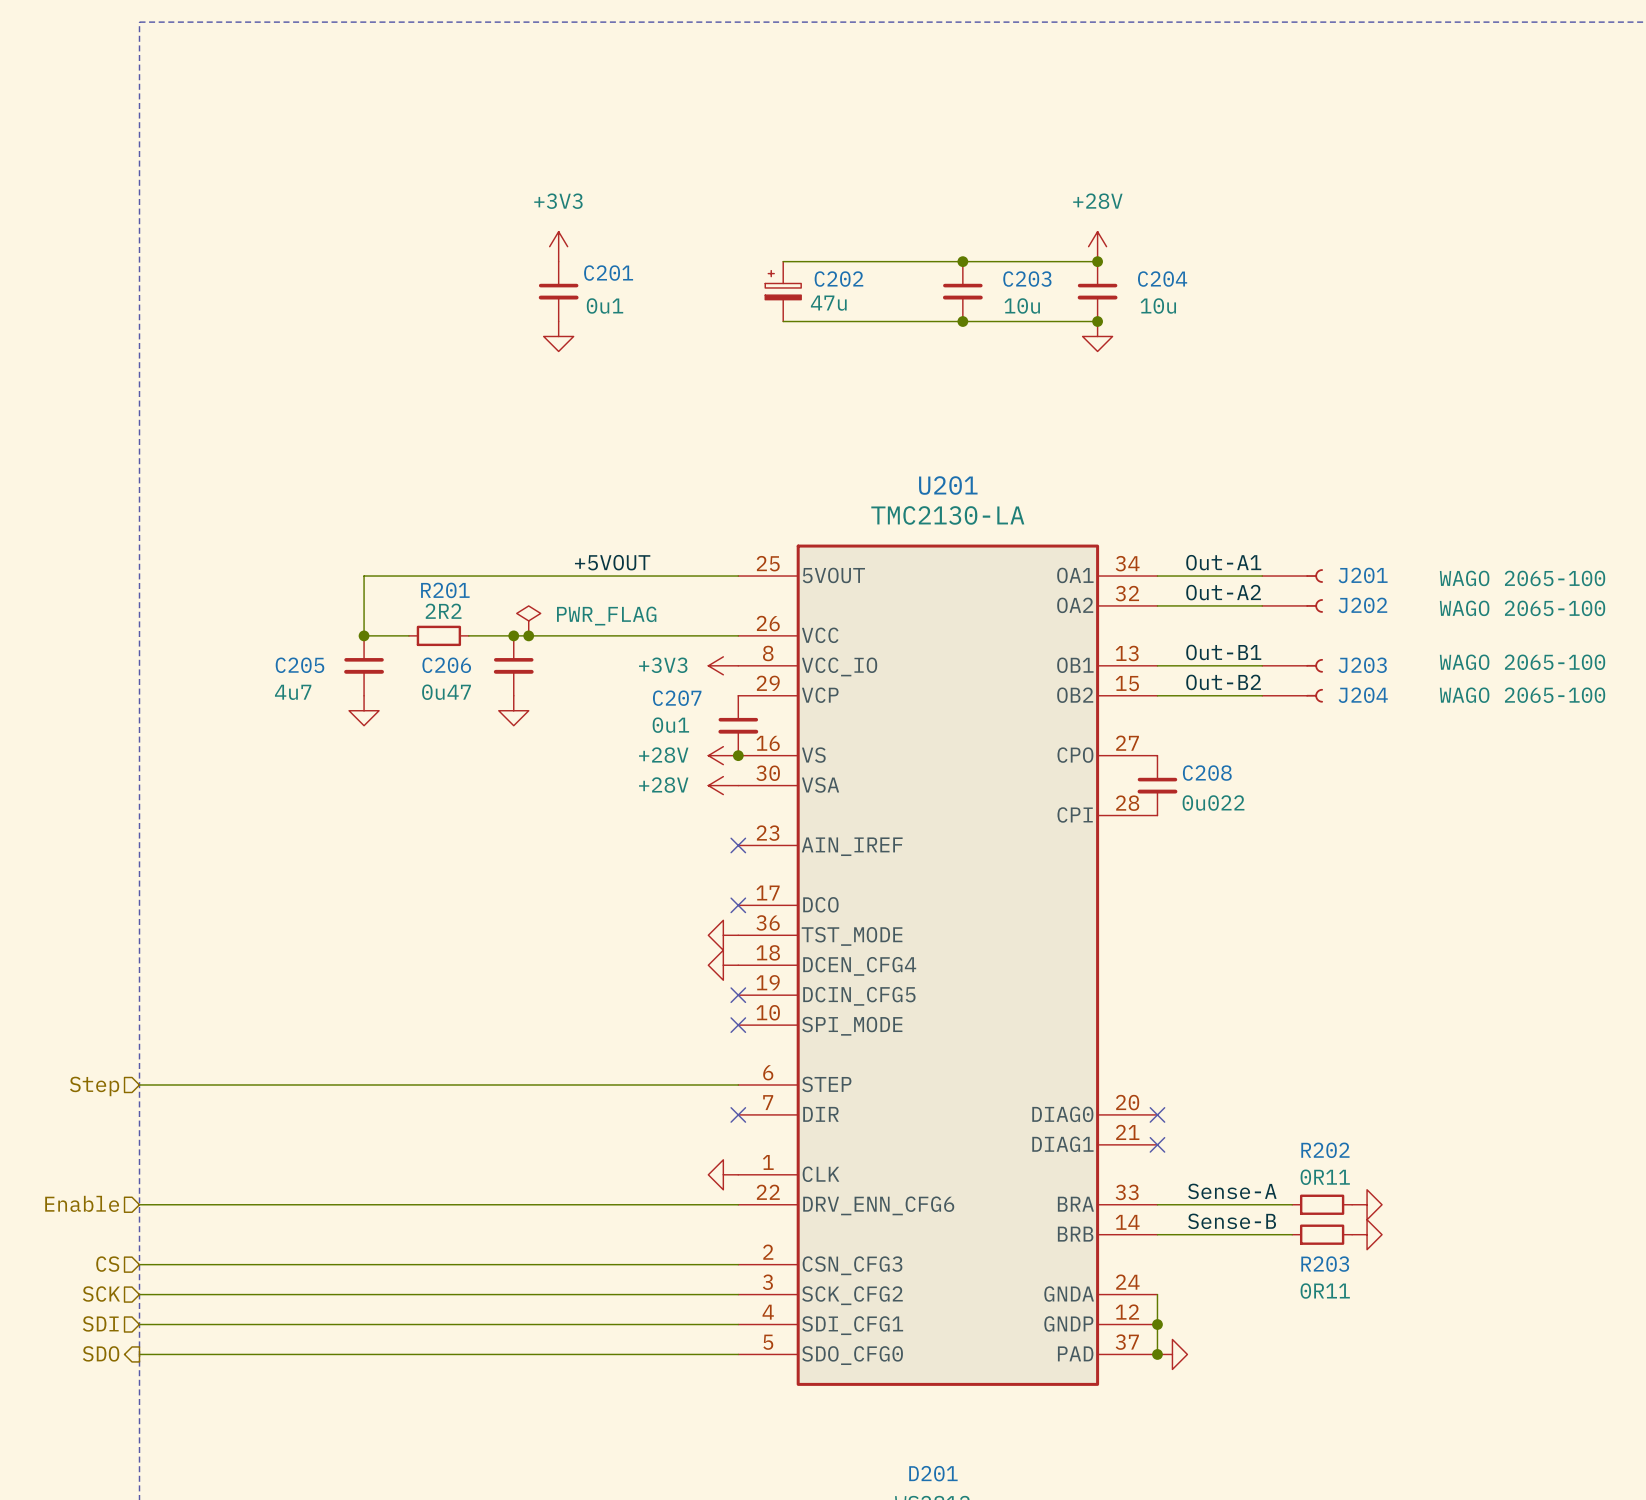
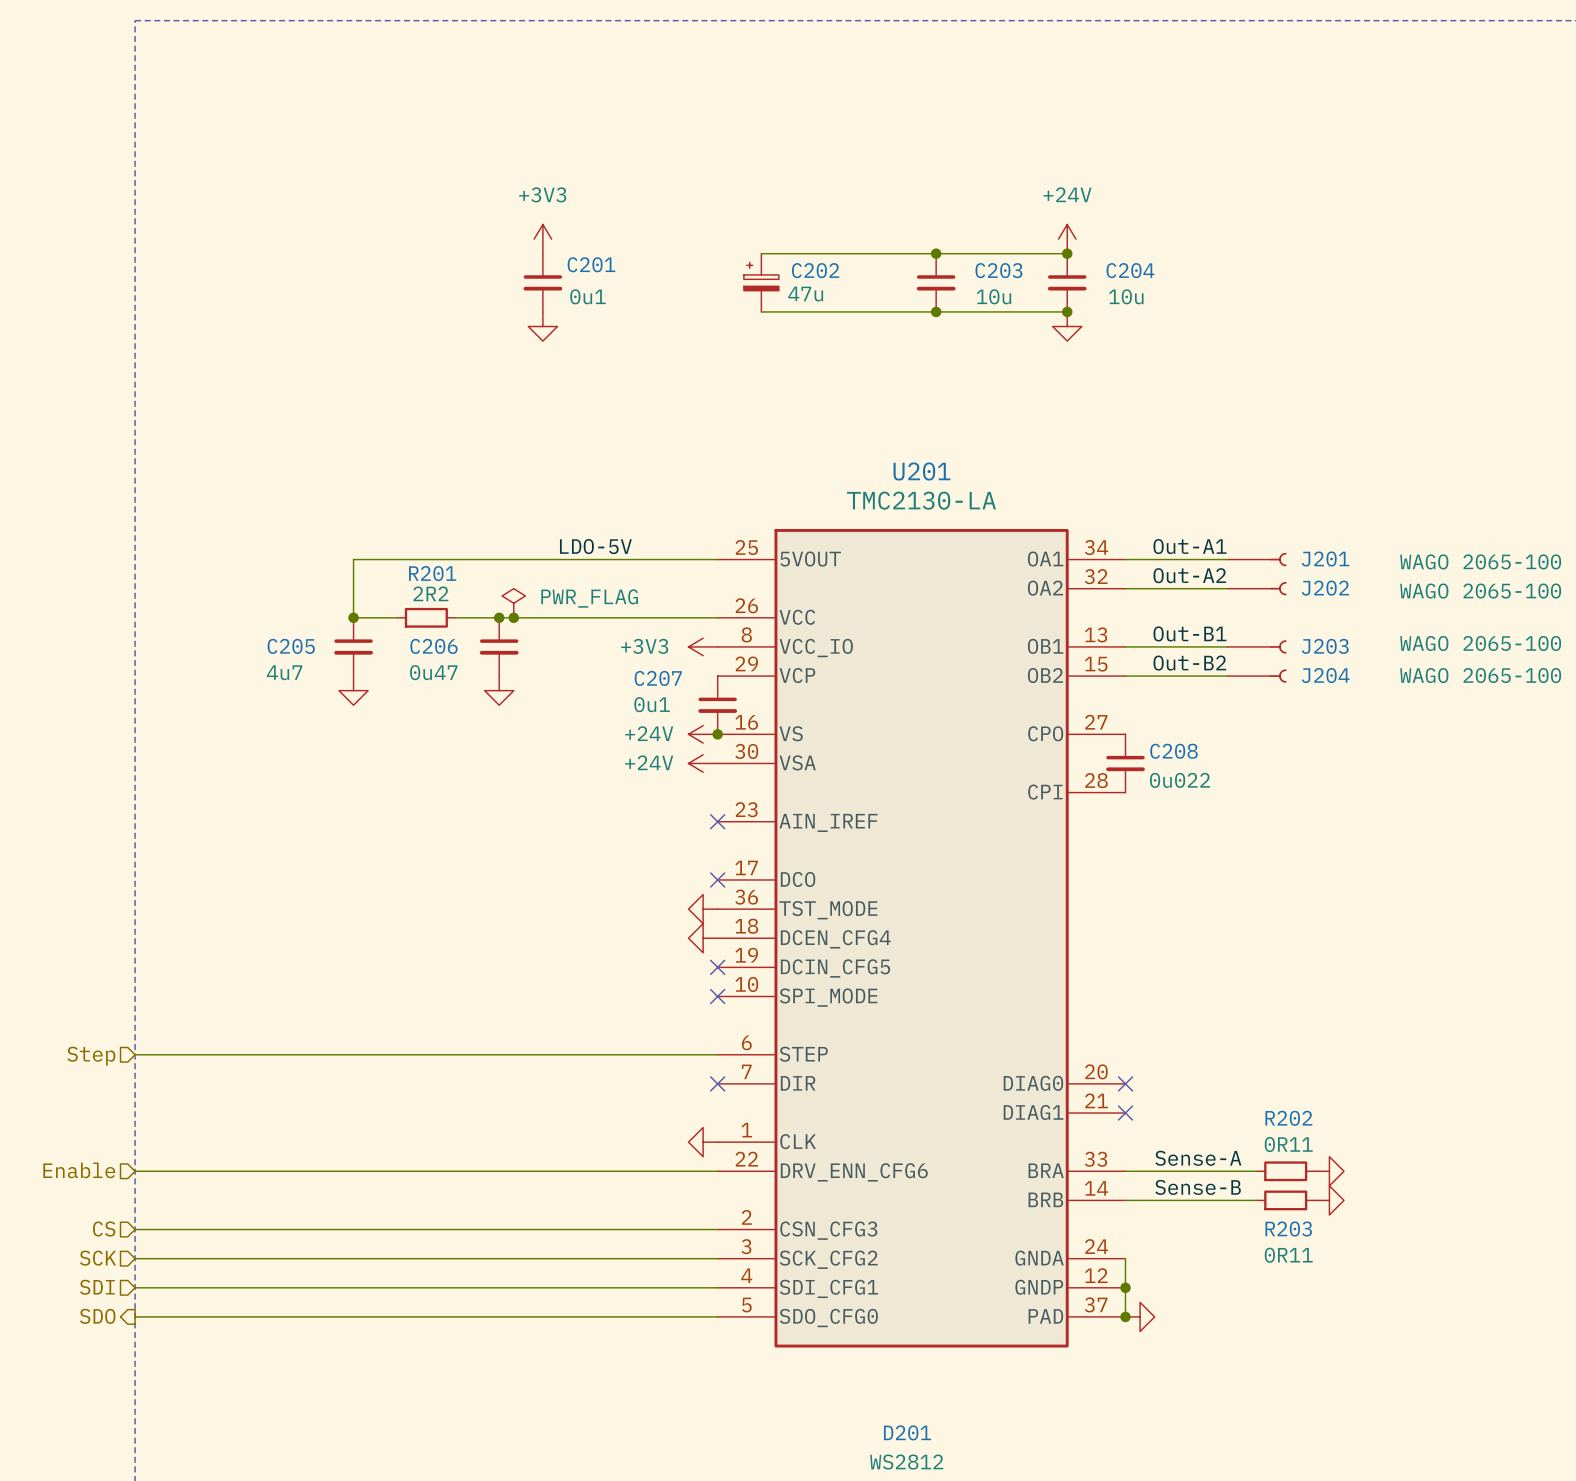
power symbol: +28V (1097, 246) -> +24V (1067, 239)
label: +5VOUT (612, 562) -> LDO-5V (595, 546)
power symbol: +28V (723, 755) -> +24V (703, 734)
power symbol: +28V (723, 785) -> +24V (703, 763)

